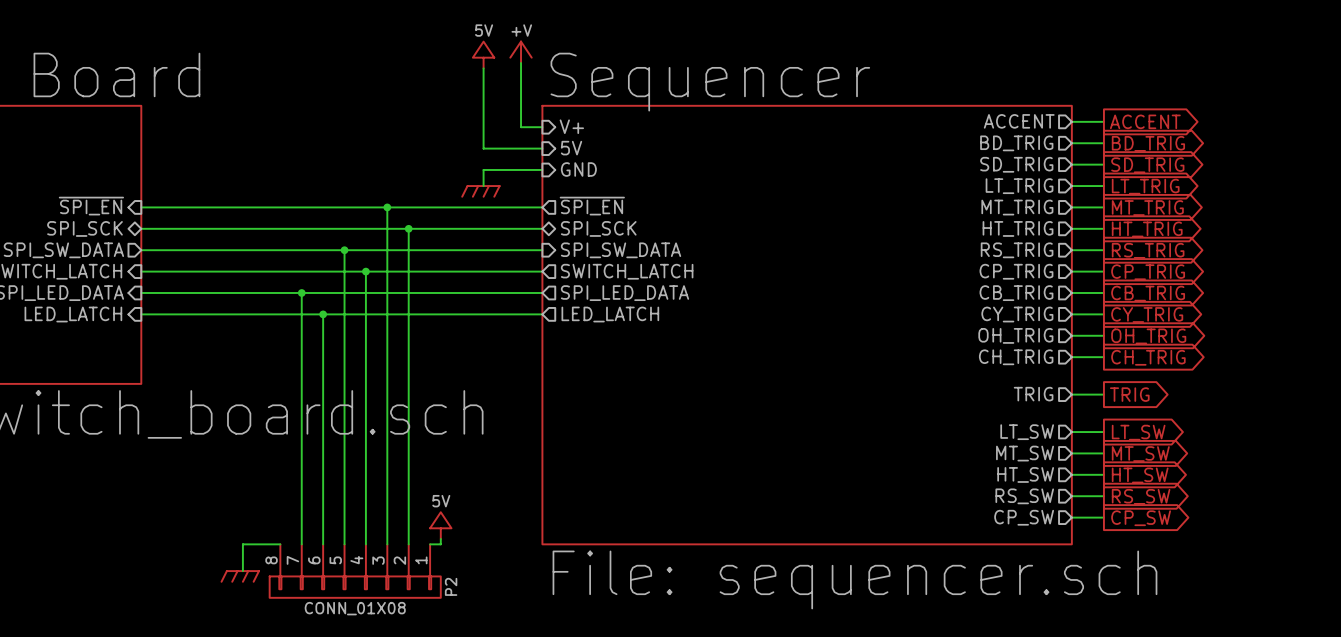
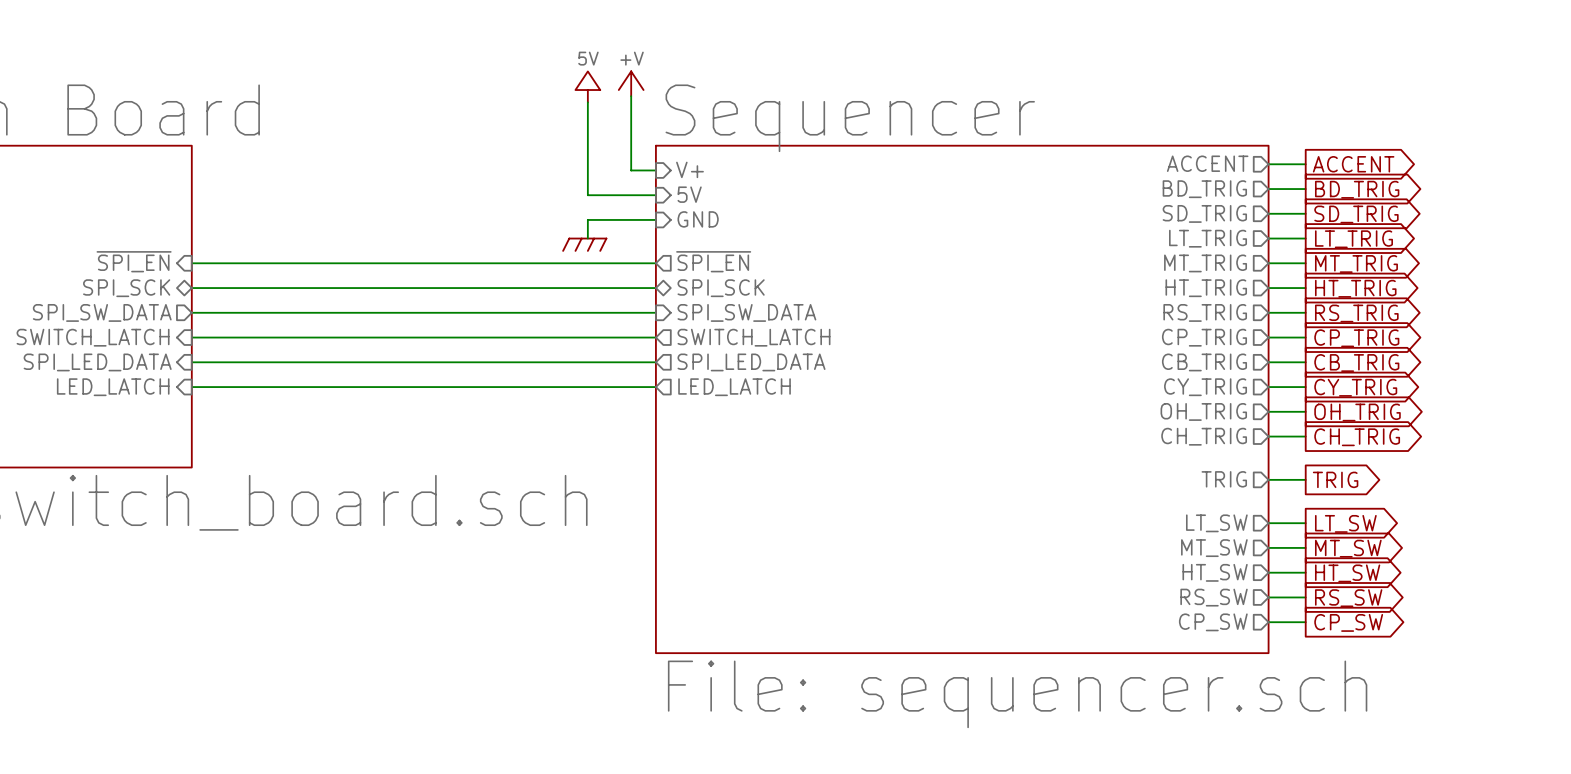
wire: (387, 207) (387, 544) -> none
junction: (387, 207) -> none
wire: (408, 228) (408, 544) -> none
junction: (408, 228) -> none
wire: (344, 250) (344, 544) -> none
junction: (344, 250) -> none
wire: (365, 271) (365, 544) -> none
junction: (365, 271) -> none
wire: (301, 292) (301, 544) -> none
junction: (301, 292) -> none
wire: (323, 314) (323, 544) -> none
junction: (323, 314) -> none
power symbol: 5V (440, 525) -> none
wire: (440, 539) (440, 544) (430, 544) -> none
wire: (280, 544) (242, 544) (242, 571) -> none
P2: CONN_01X08 (355, 571) -> none
power symbol: (240, 576) -> none

